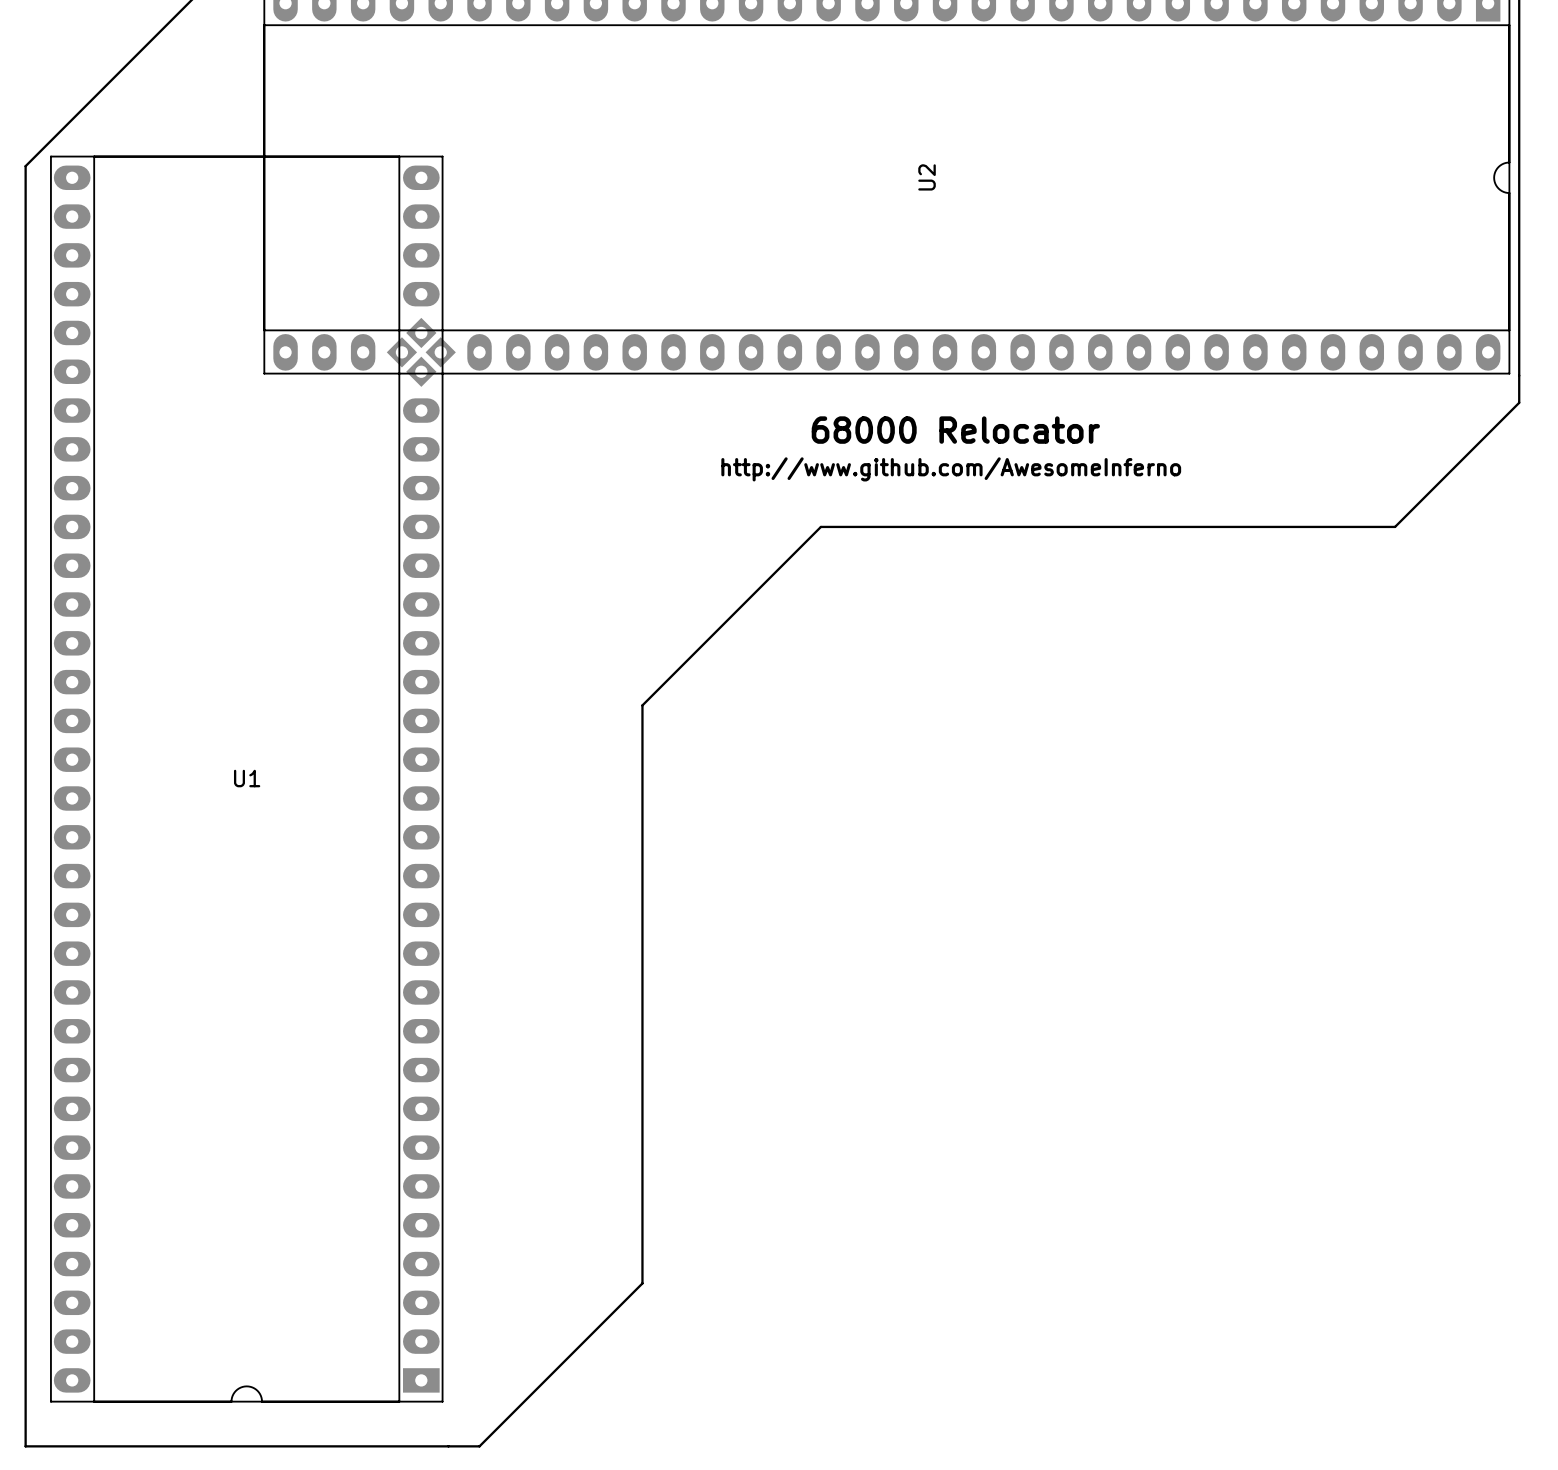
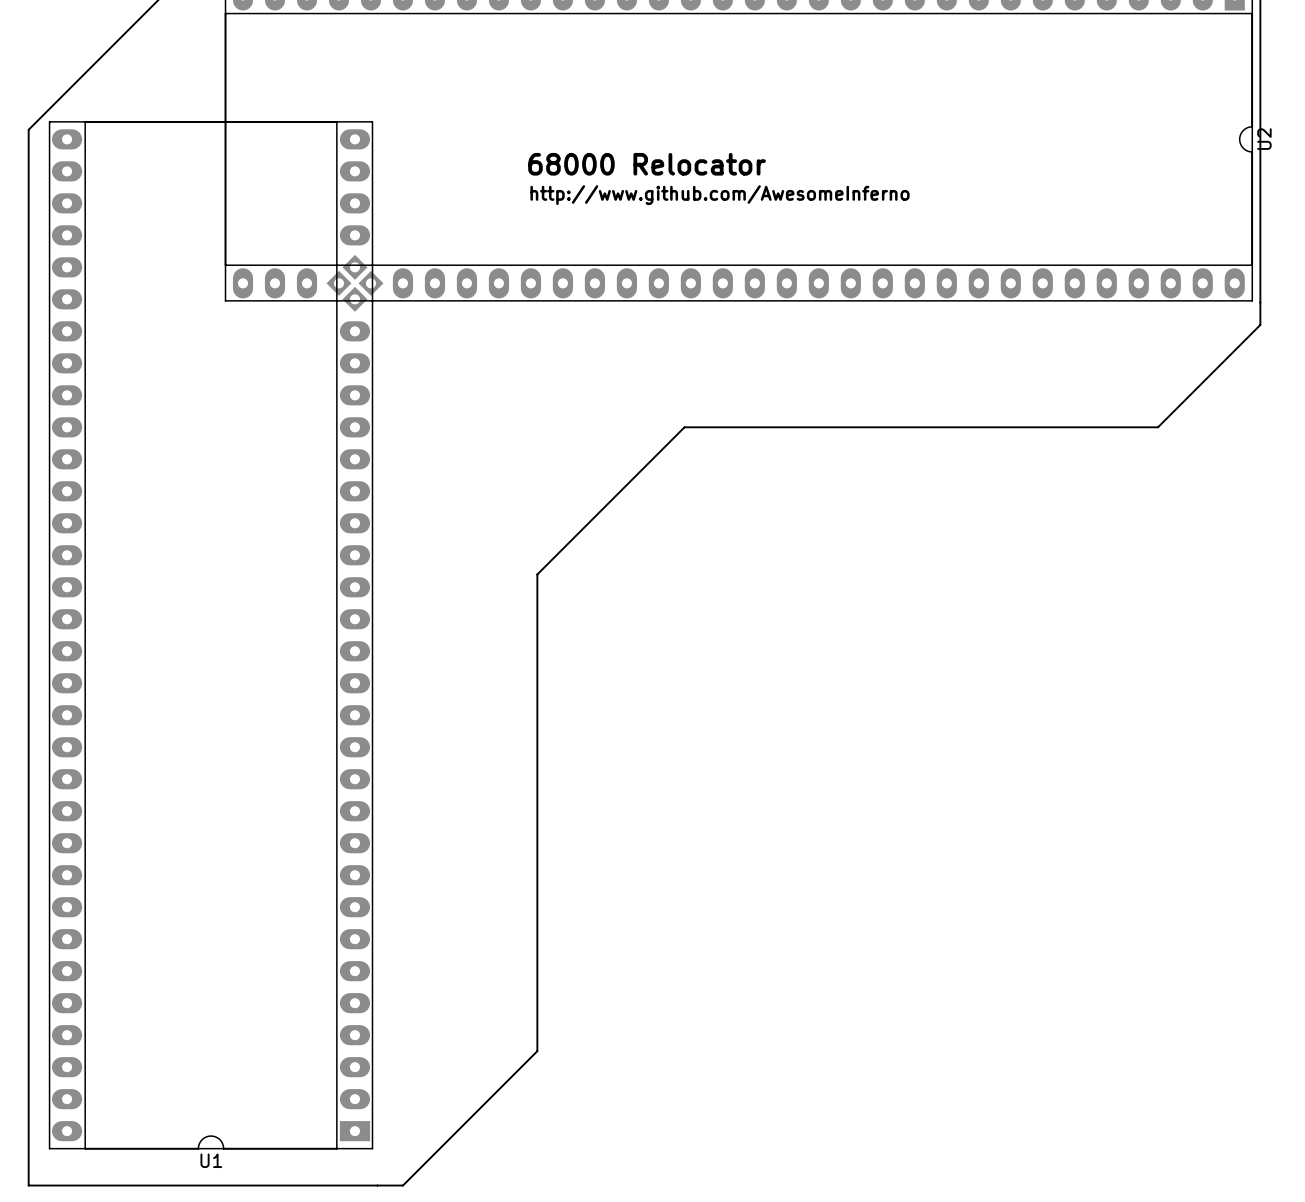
U2 name position: U2 (927, 177) -> U2 (1264, 139)
text position: 68000 Relocator (955, 430) -> 68000 Relocator (647, 164)
text position: http://www.github.com/AwesomeInferno (951, 469) -> http://www.github.com/AwesomeInferno (720, 195)
U1 name position: U1 (247, 778) -> U1 (211, 1160)

